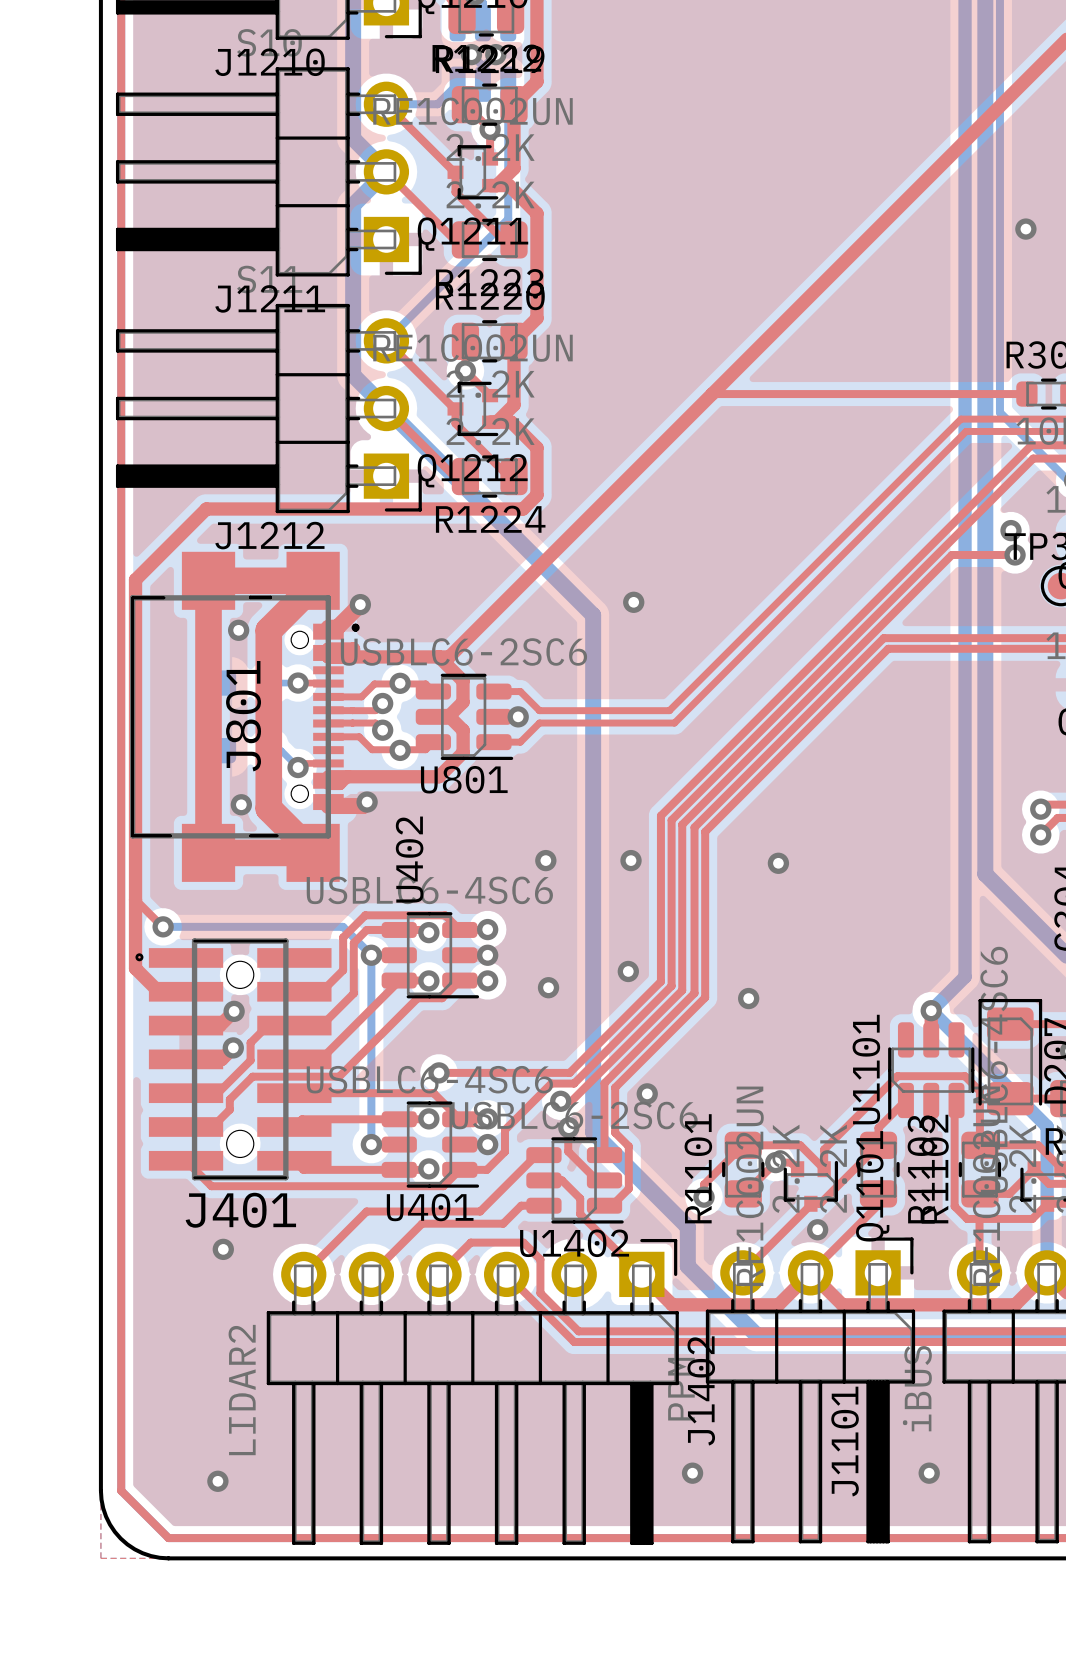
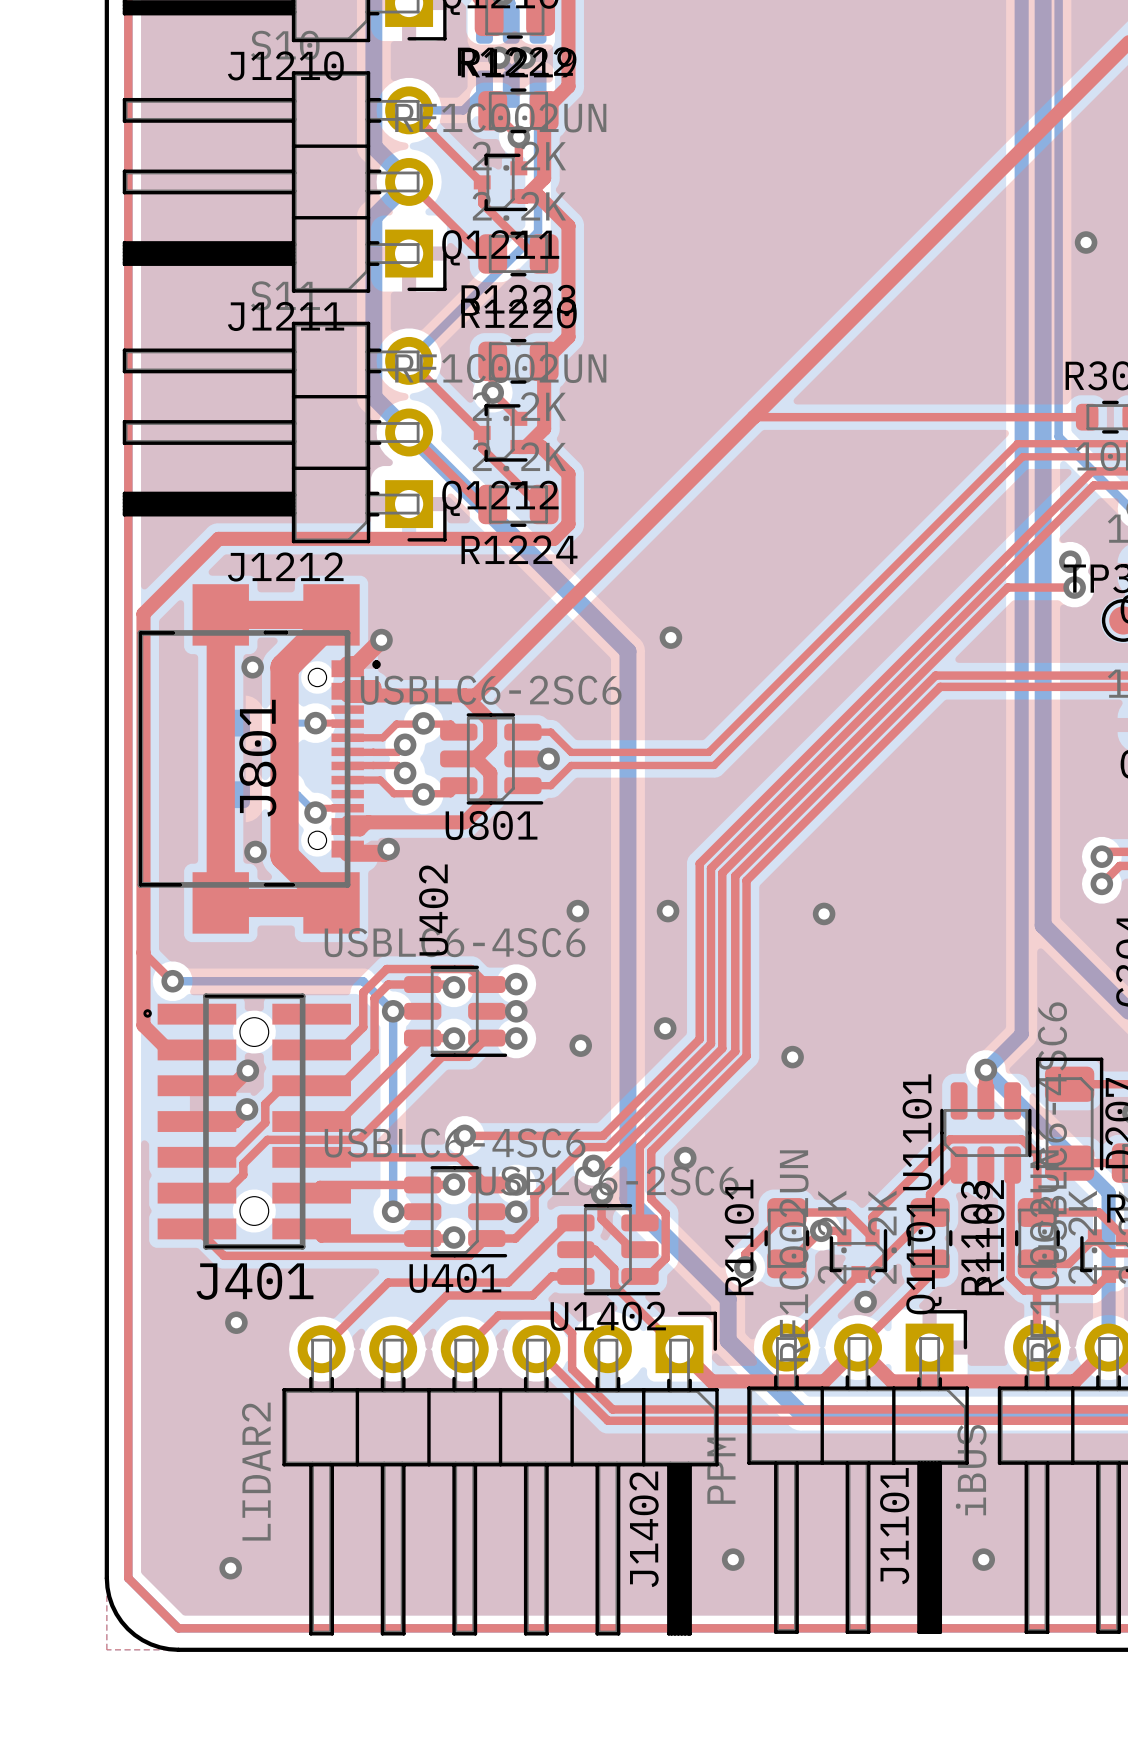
J1402 name position: J1402 (701, 1390) -> J1402 (644, 1529)

